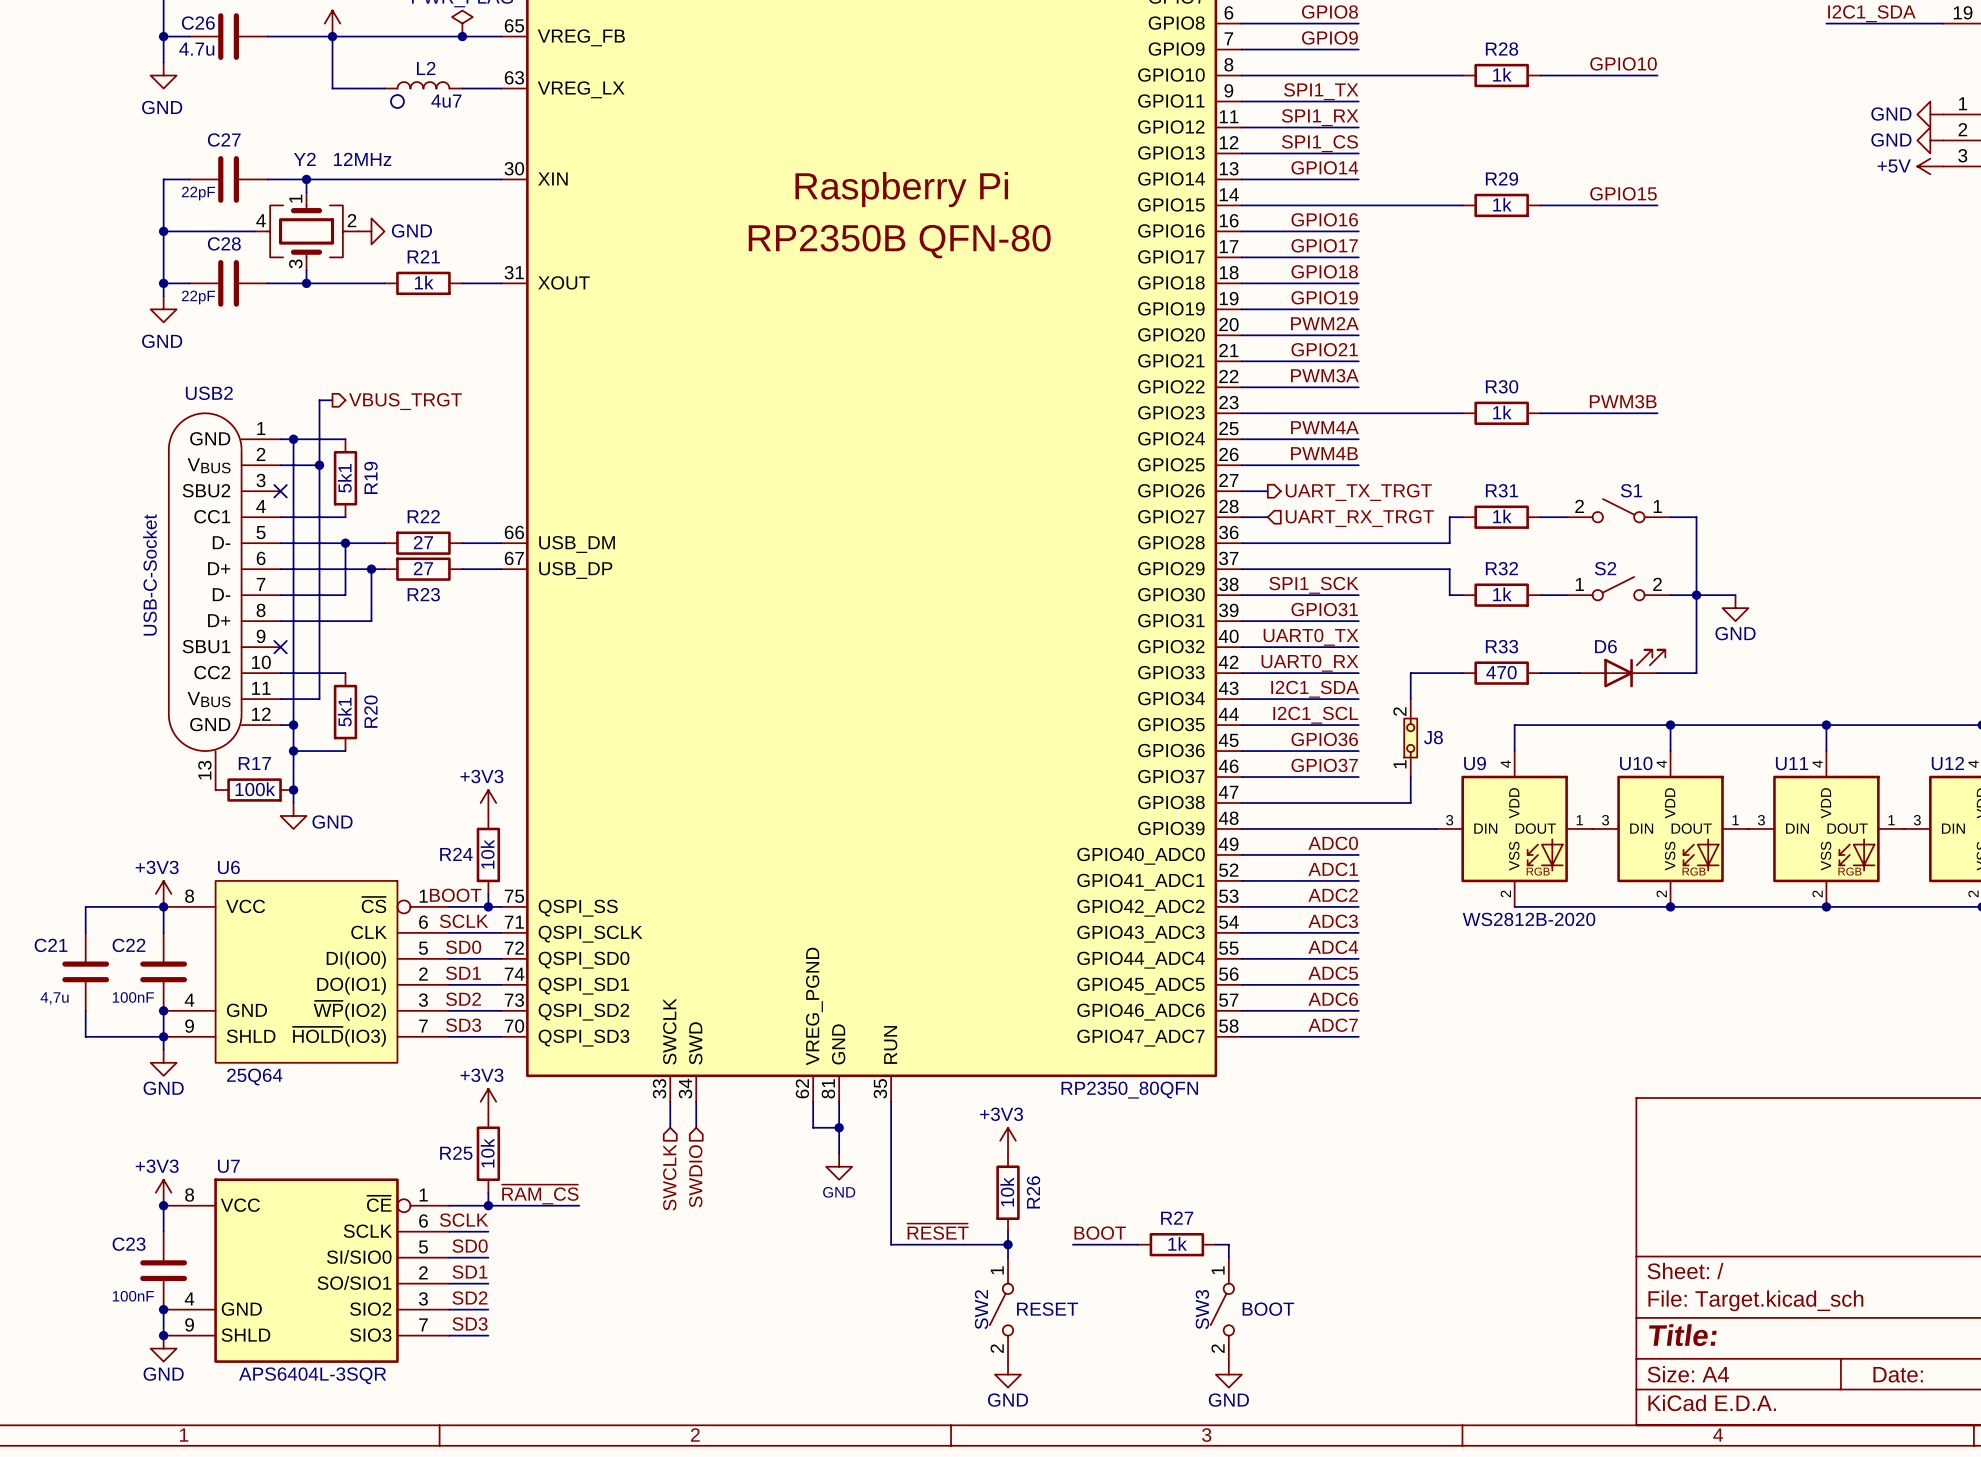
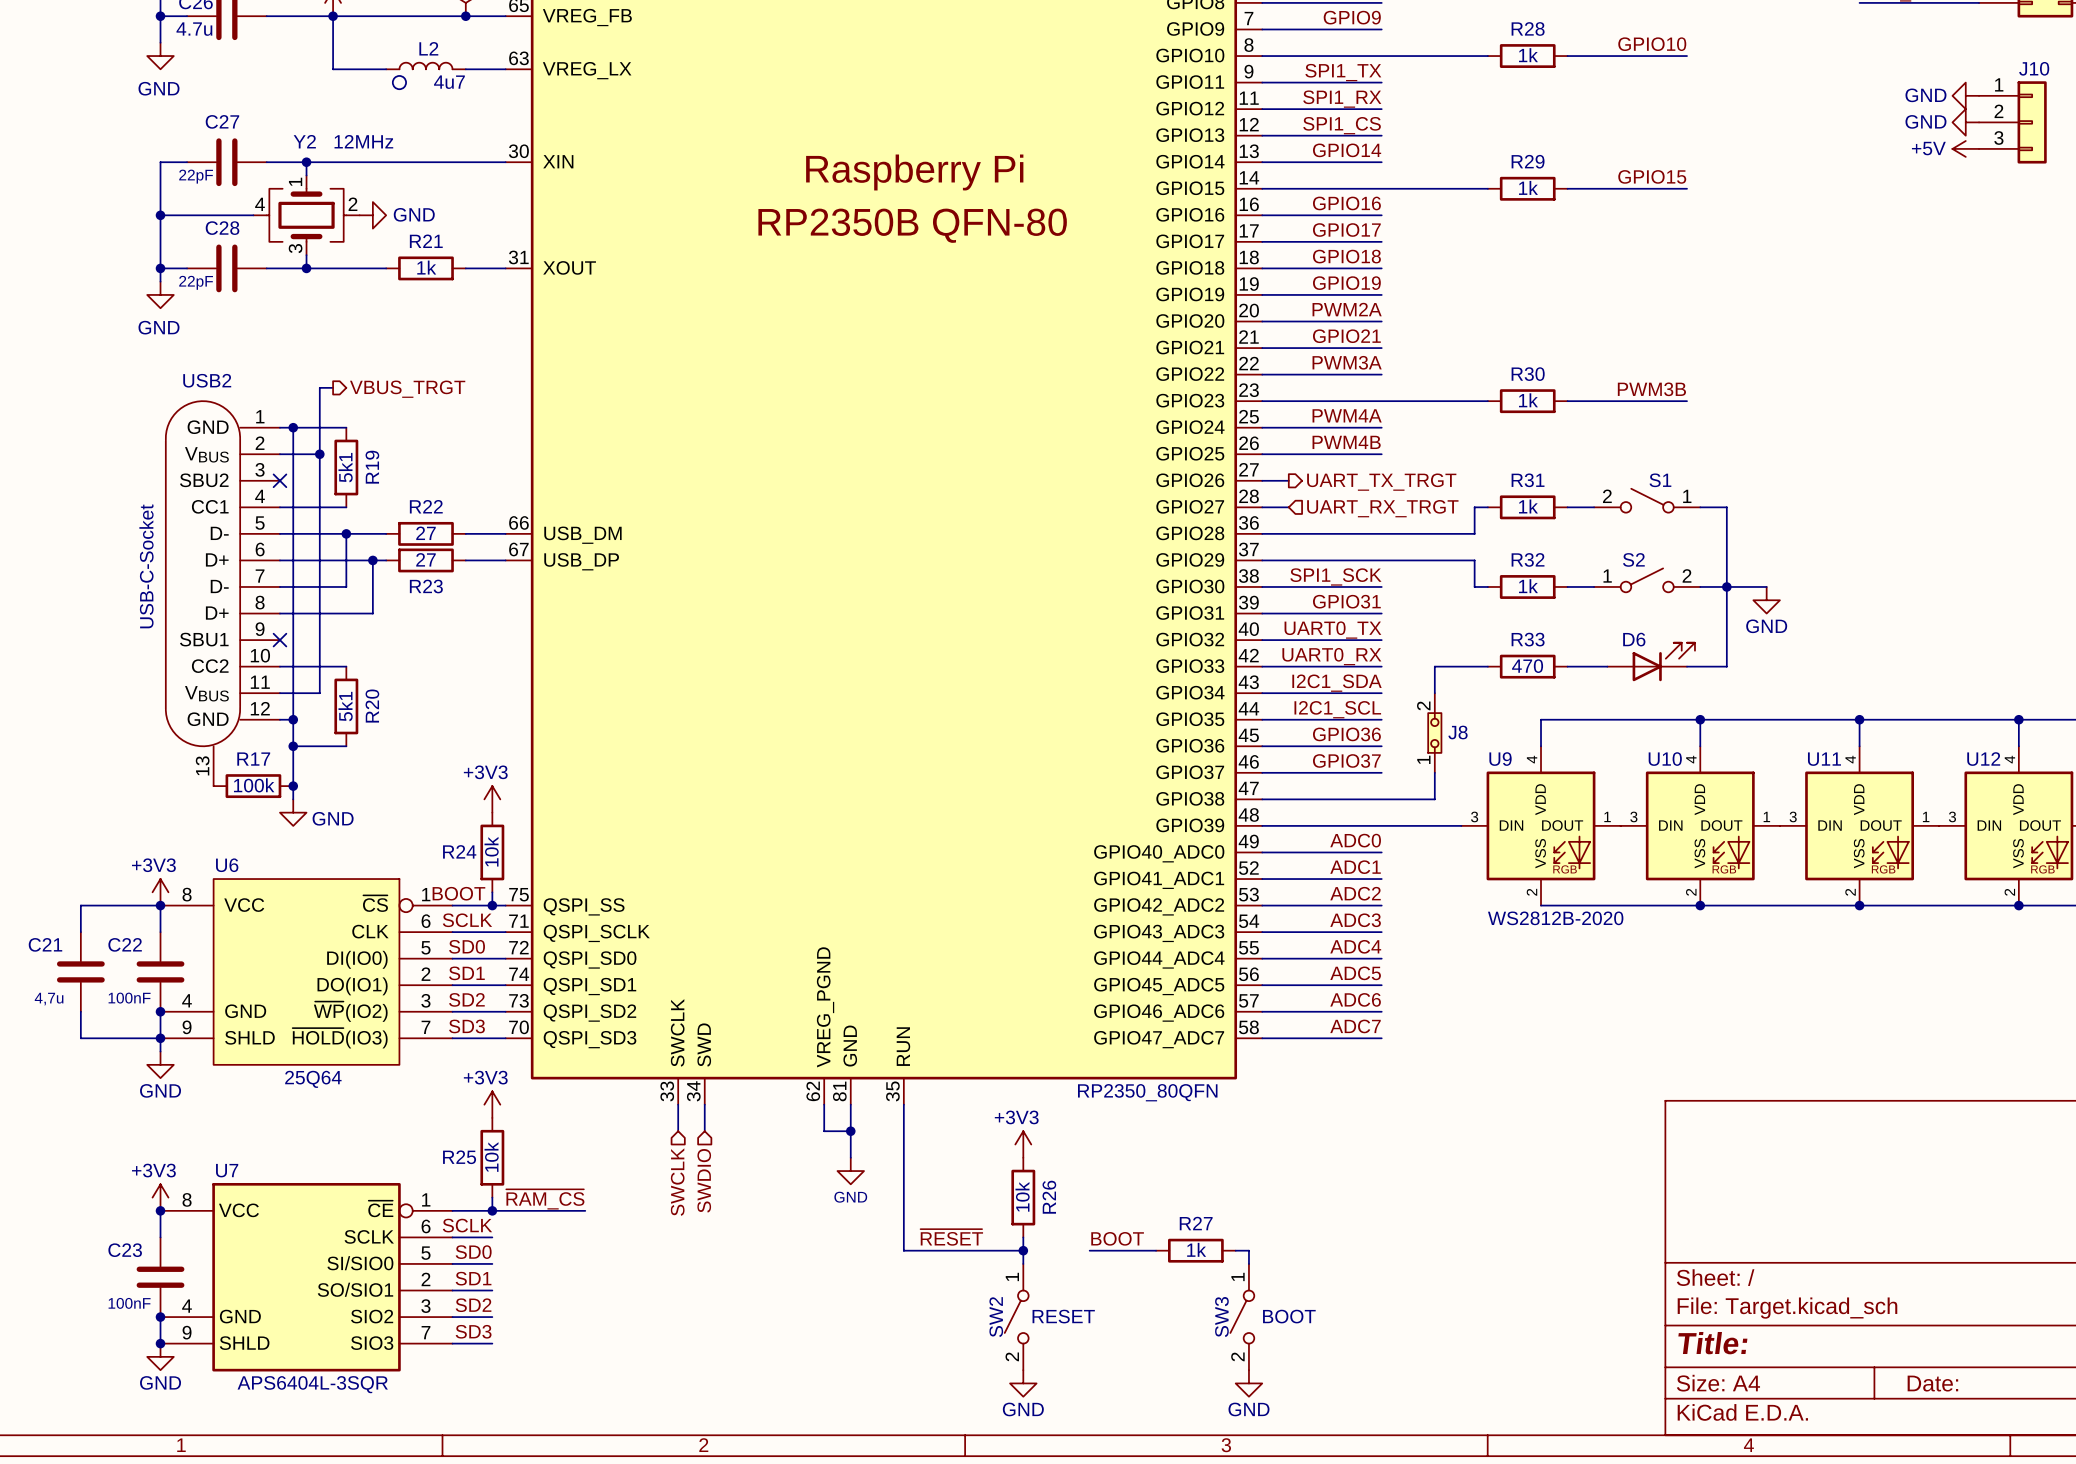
U6 value position: 25Q64 (254, 1077) -> 25Q64 (313, 1079)

